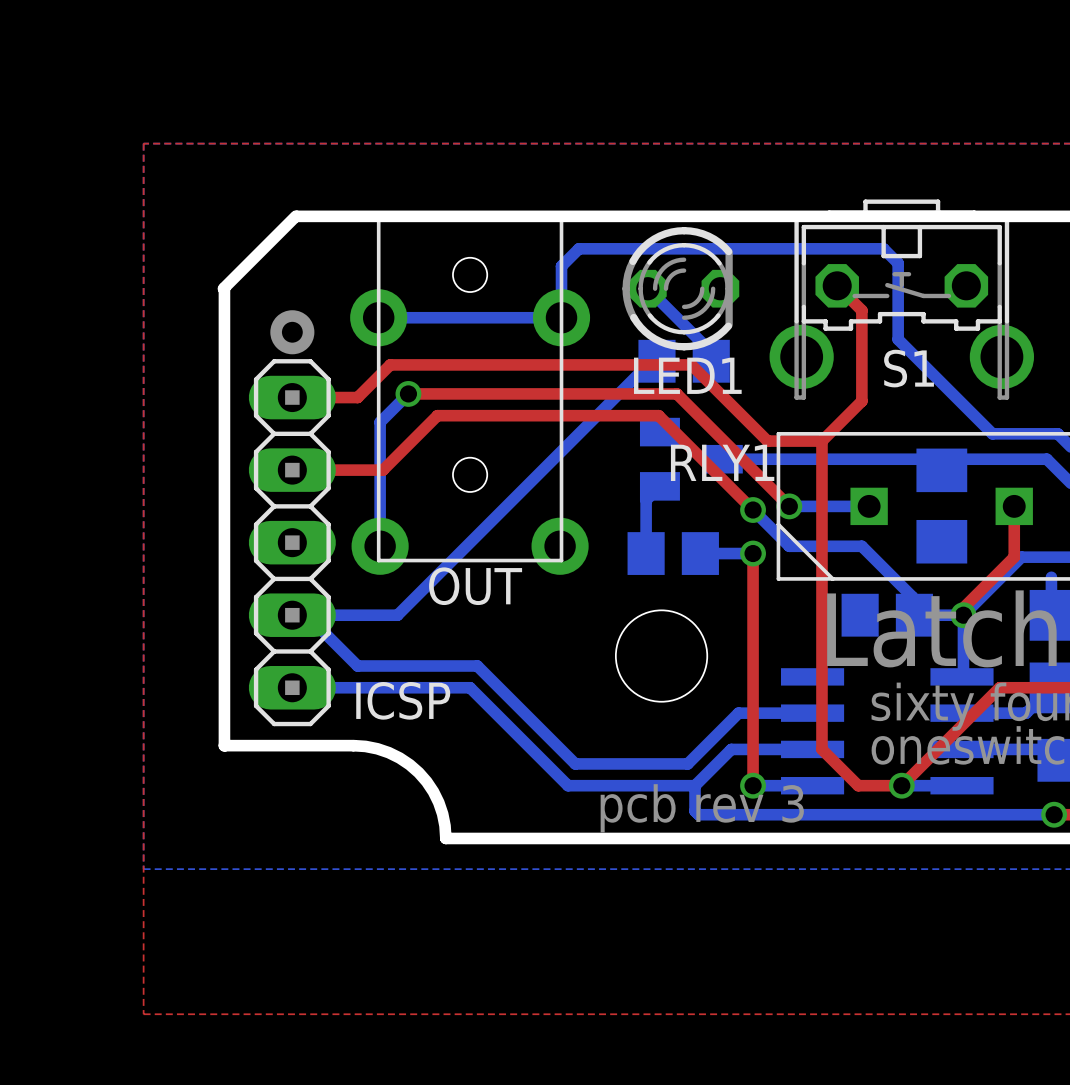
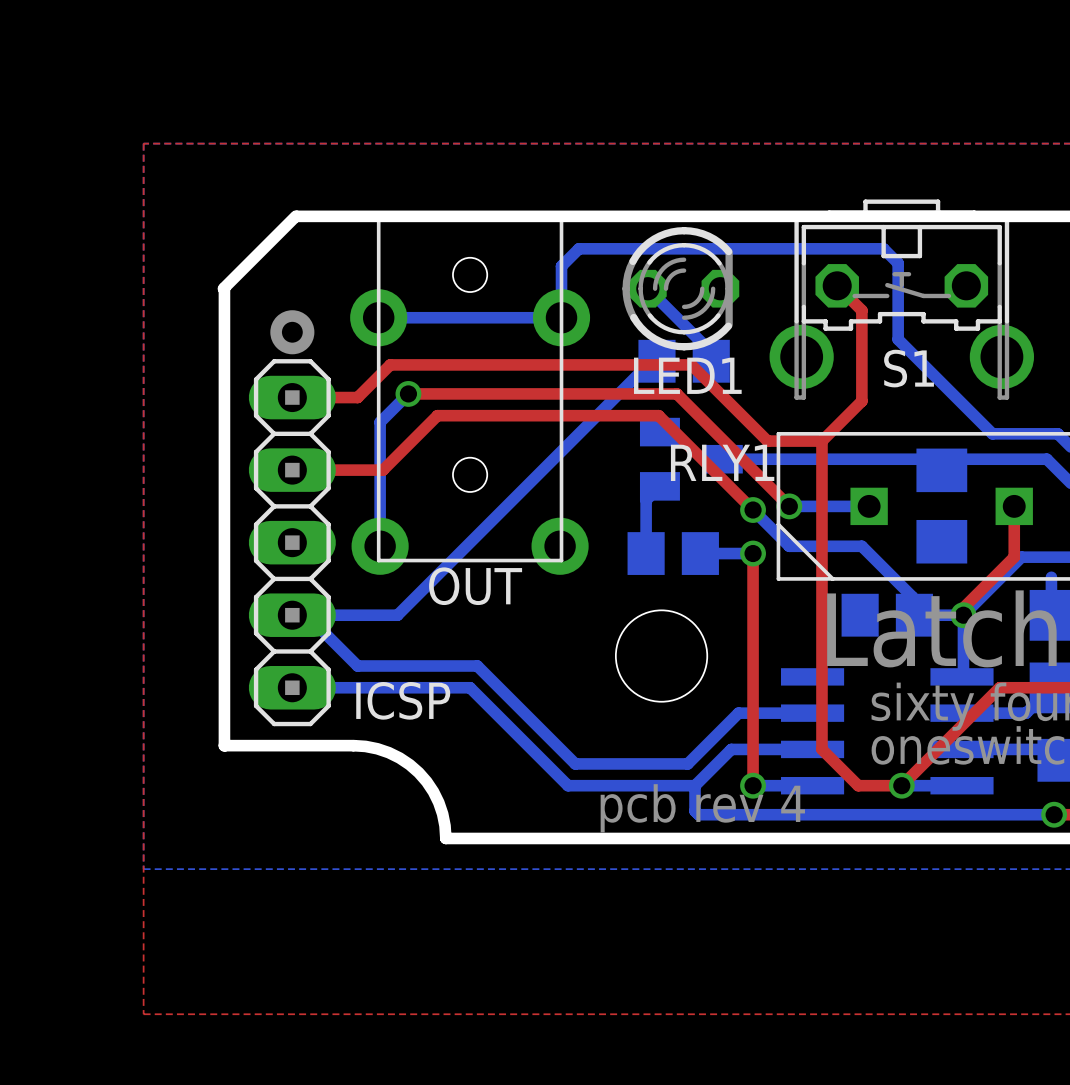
text: pcb rev 3 (702, 808) -> pcb rev 4 (702, 808)

